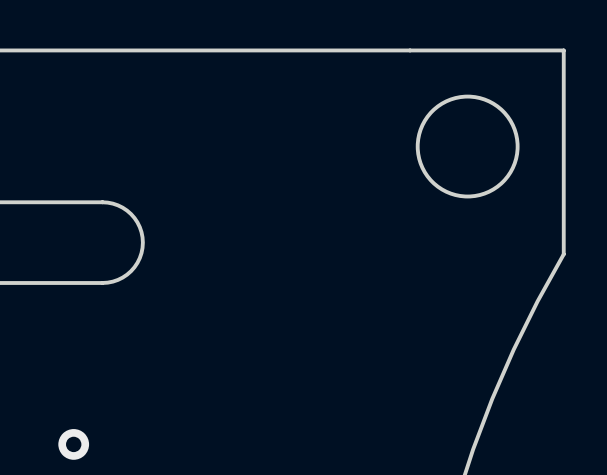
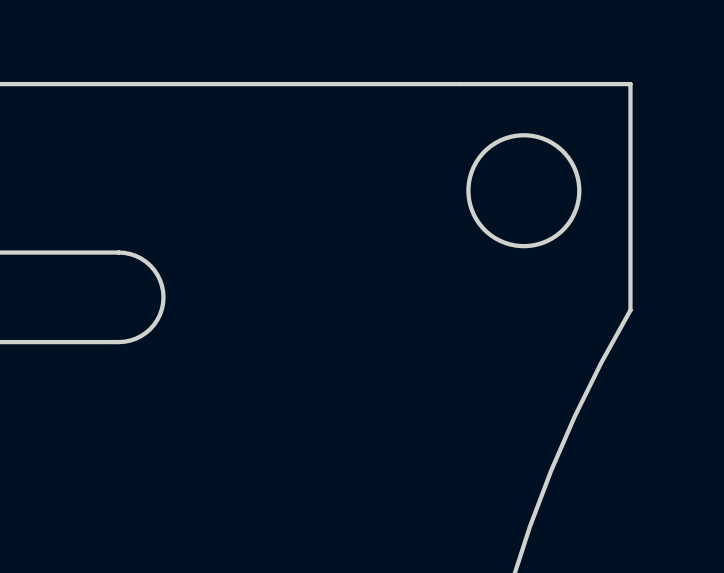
via: (73, 444) -> none

